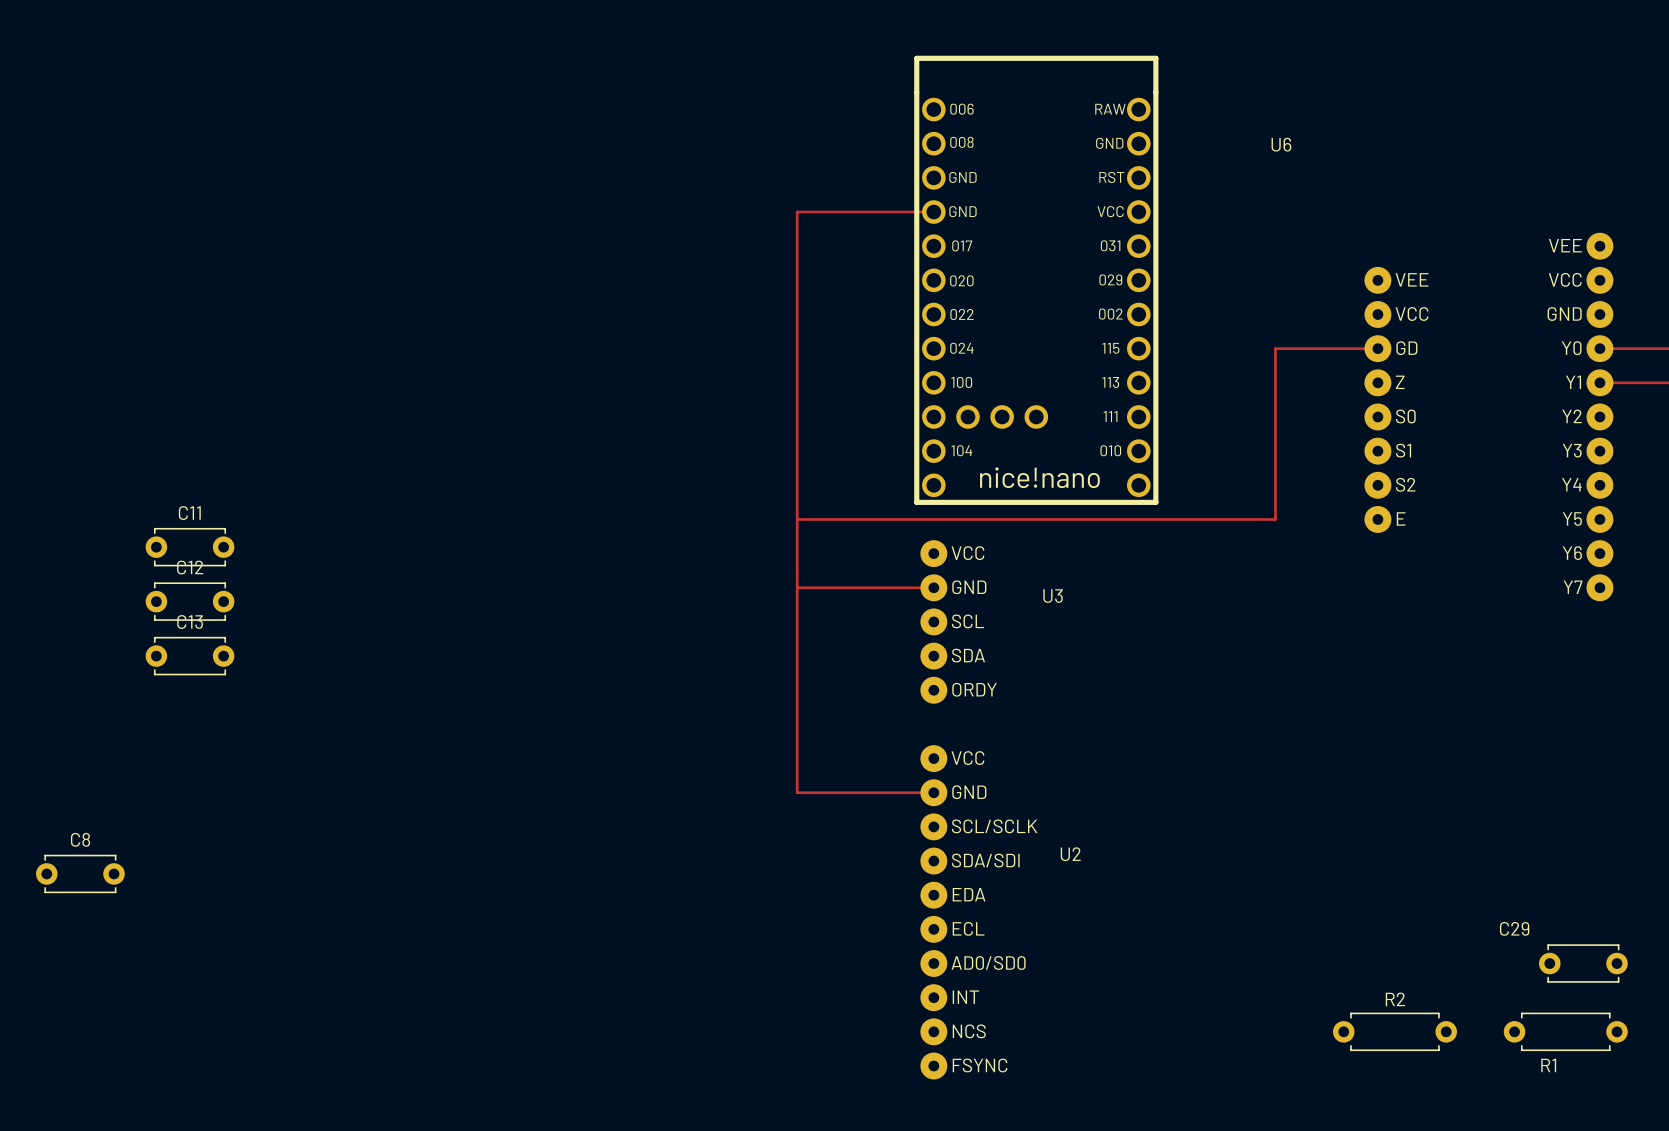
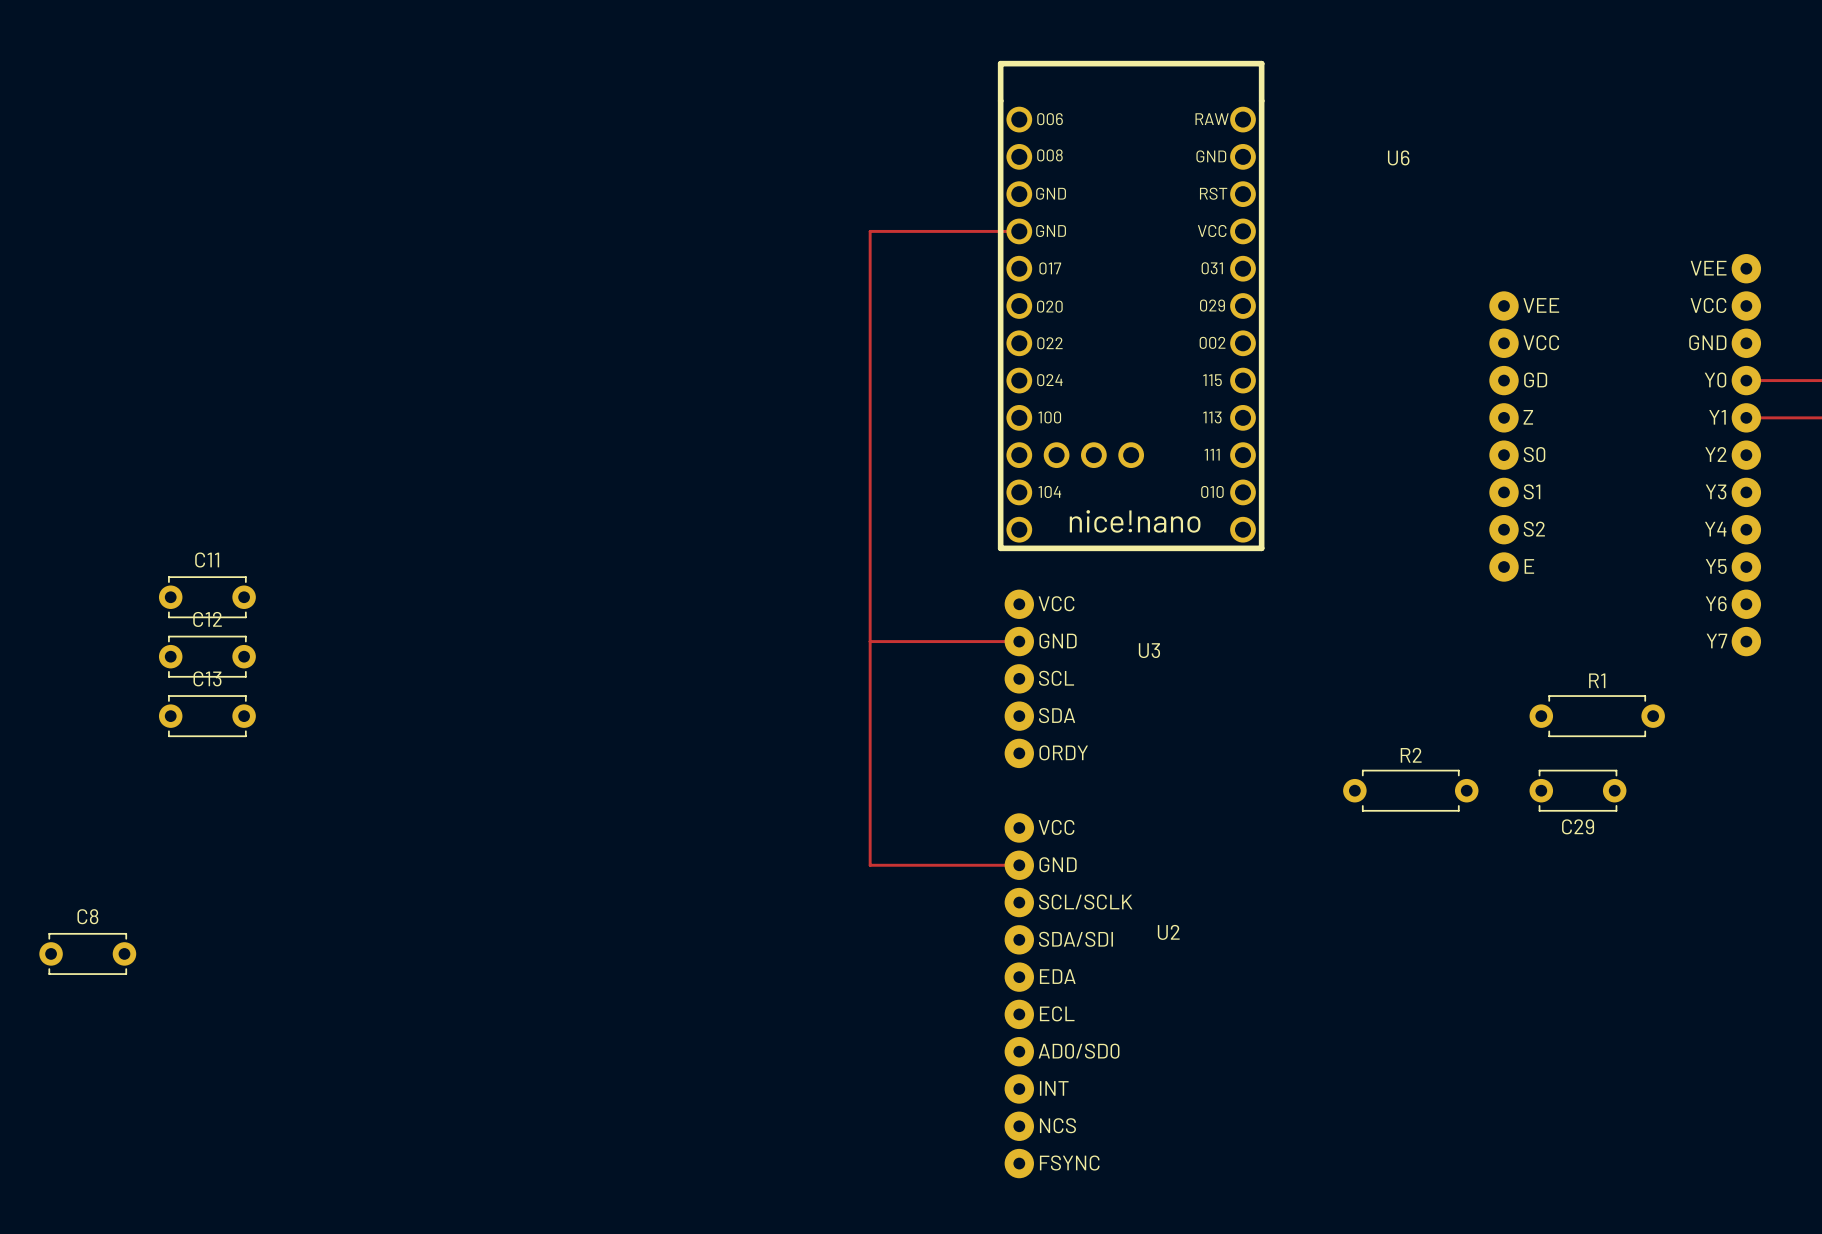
top track: (1377, 348) (1275, 348) (1275, 519) (797, 519) -> none
C29 name position: C29 (1514, 928) -> C29 (1578, 826)
C29 position: (1583, 963) -> (1577, 790)
R2 position: (1394, 1031) -> (1410, 790)
R1 position: (1565, 1031) -> (1597, 716)
R1 name position: R1 (1548, 1065) -> R1 (1597, 680)

